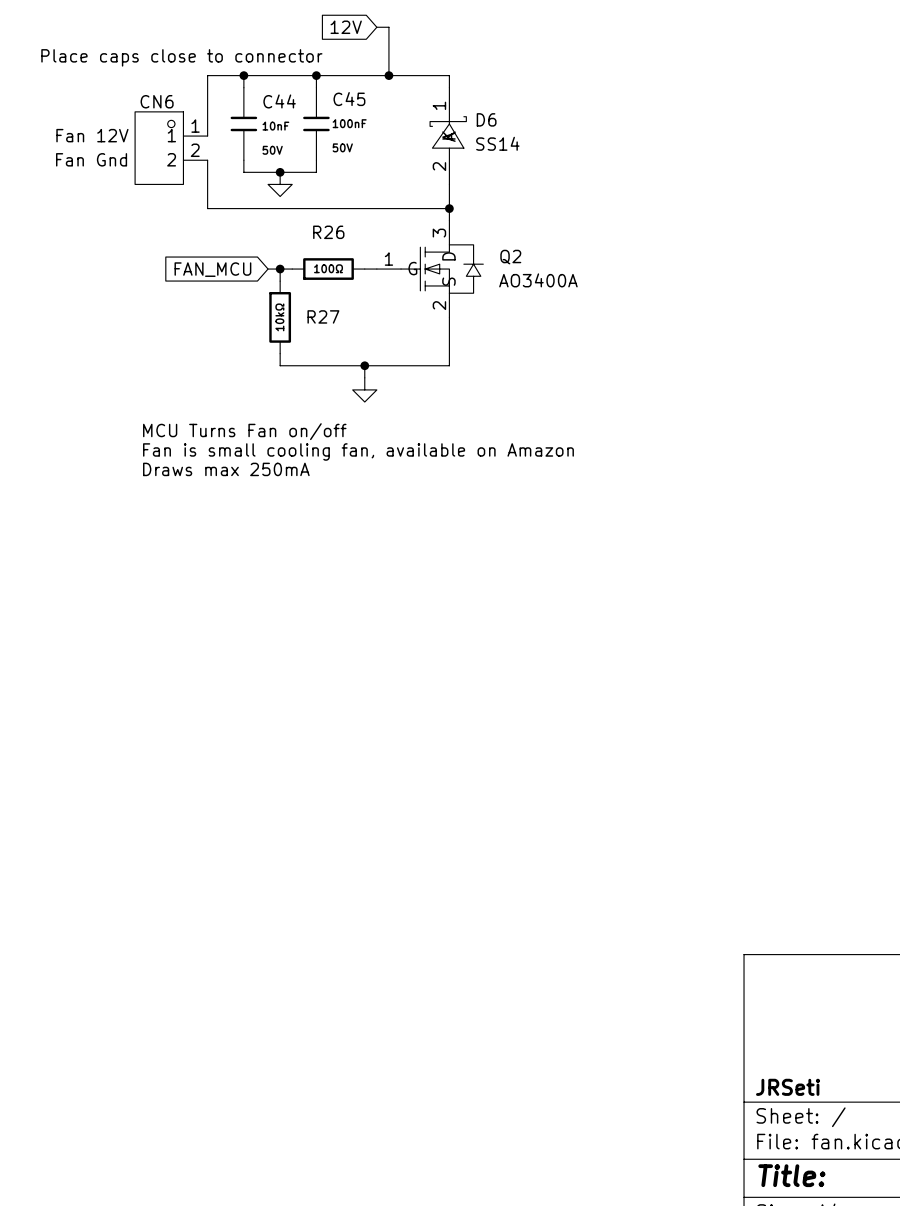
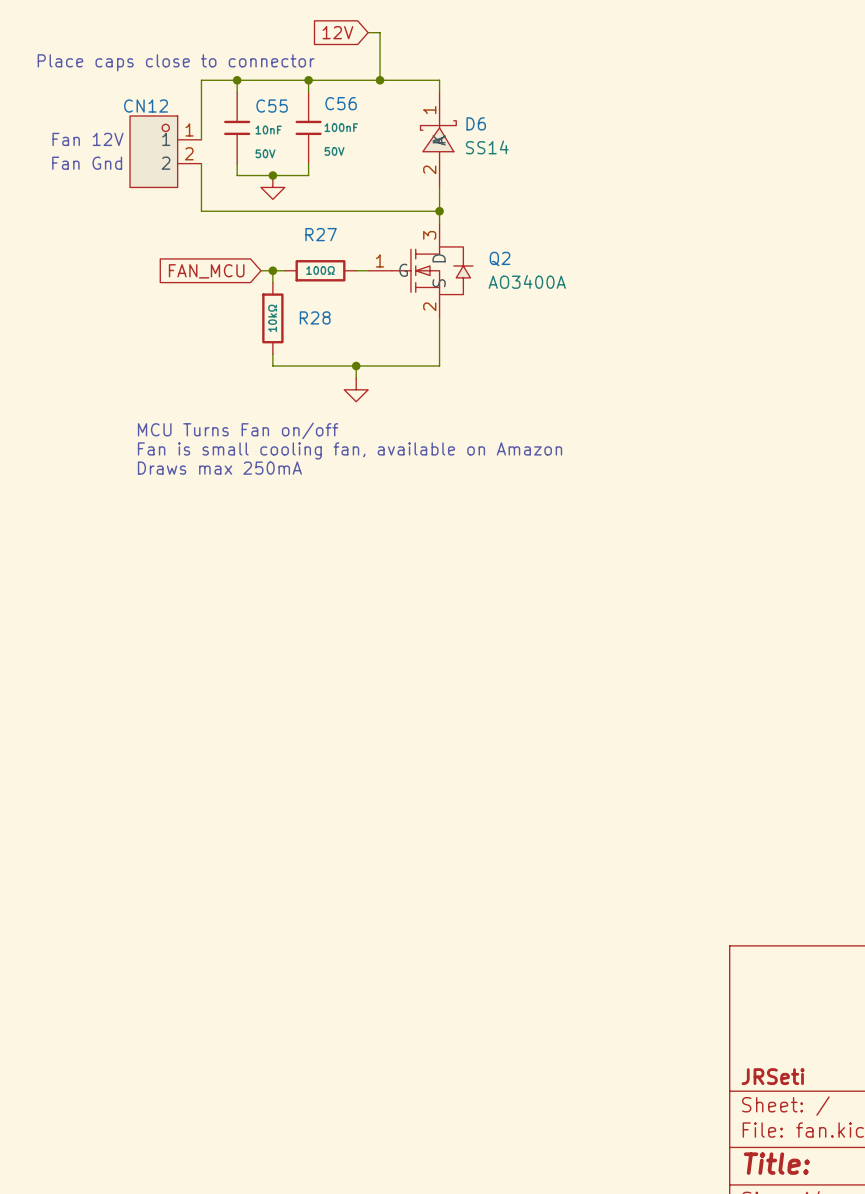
C45 name: C45 (349, 99) -> C56 (341, 103)
CN6 name: CN6 (157, 101) -> CN12 (146, 106)
C44 name: C44 (279, 101) -> C55 (272, 106)
R26 name: R26 (328, 232) -> R27 (321, 234)
R27 name: R27 (323, 316) -> R28 (315, 317)

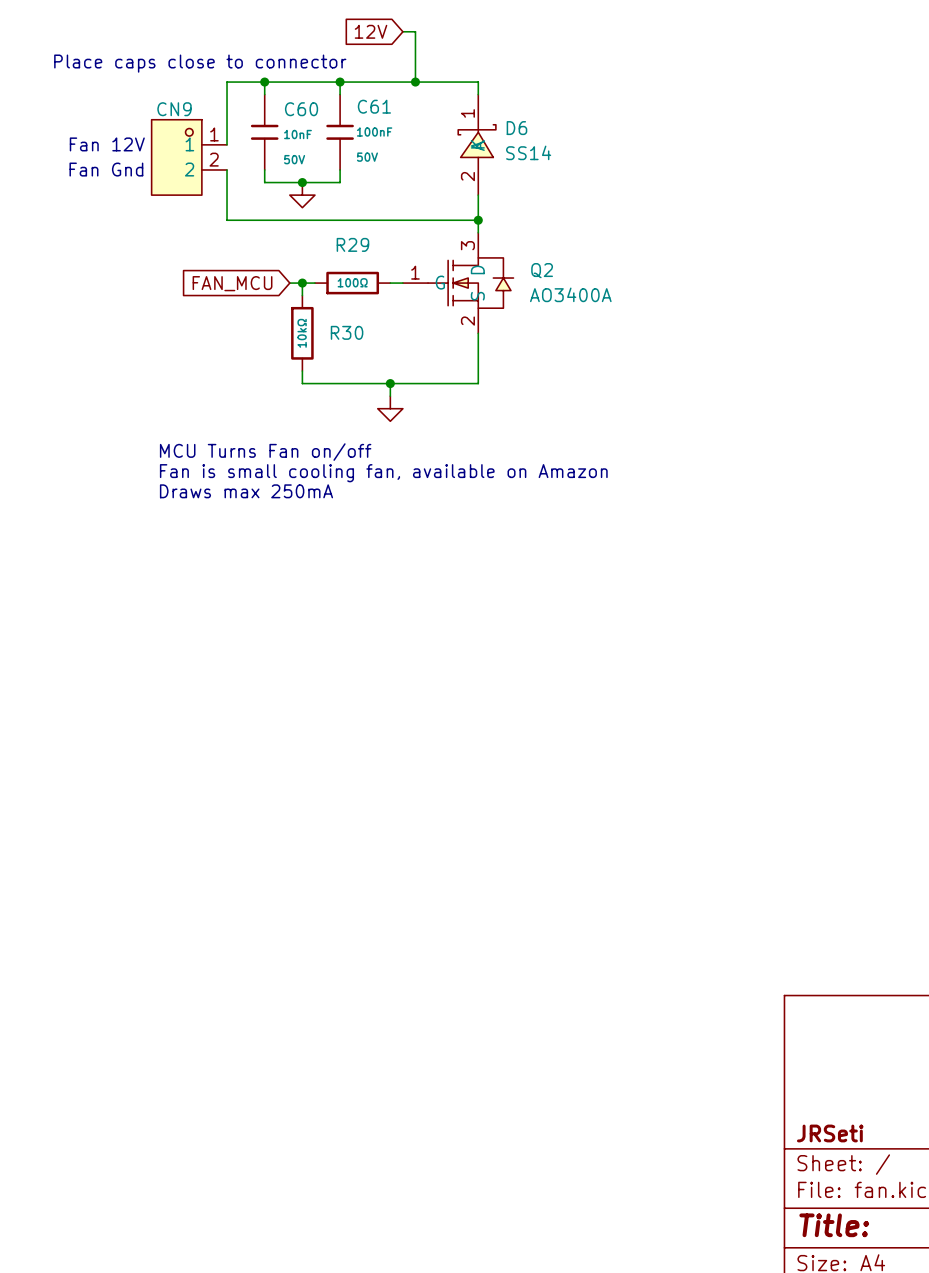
C56 name: C56 (341, 103) -> C61 (374, 106)
CN12 name: CN12 (146, 106) -> CN9 (174, 109)
C55 name: C55 (272, 106) -> C60 (301, 109)
R27 name: R27 (321, 234) -> R29 (352, 244)
R28 name: R28 (315, 317) -> R30 (347, 332)

